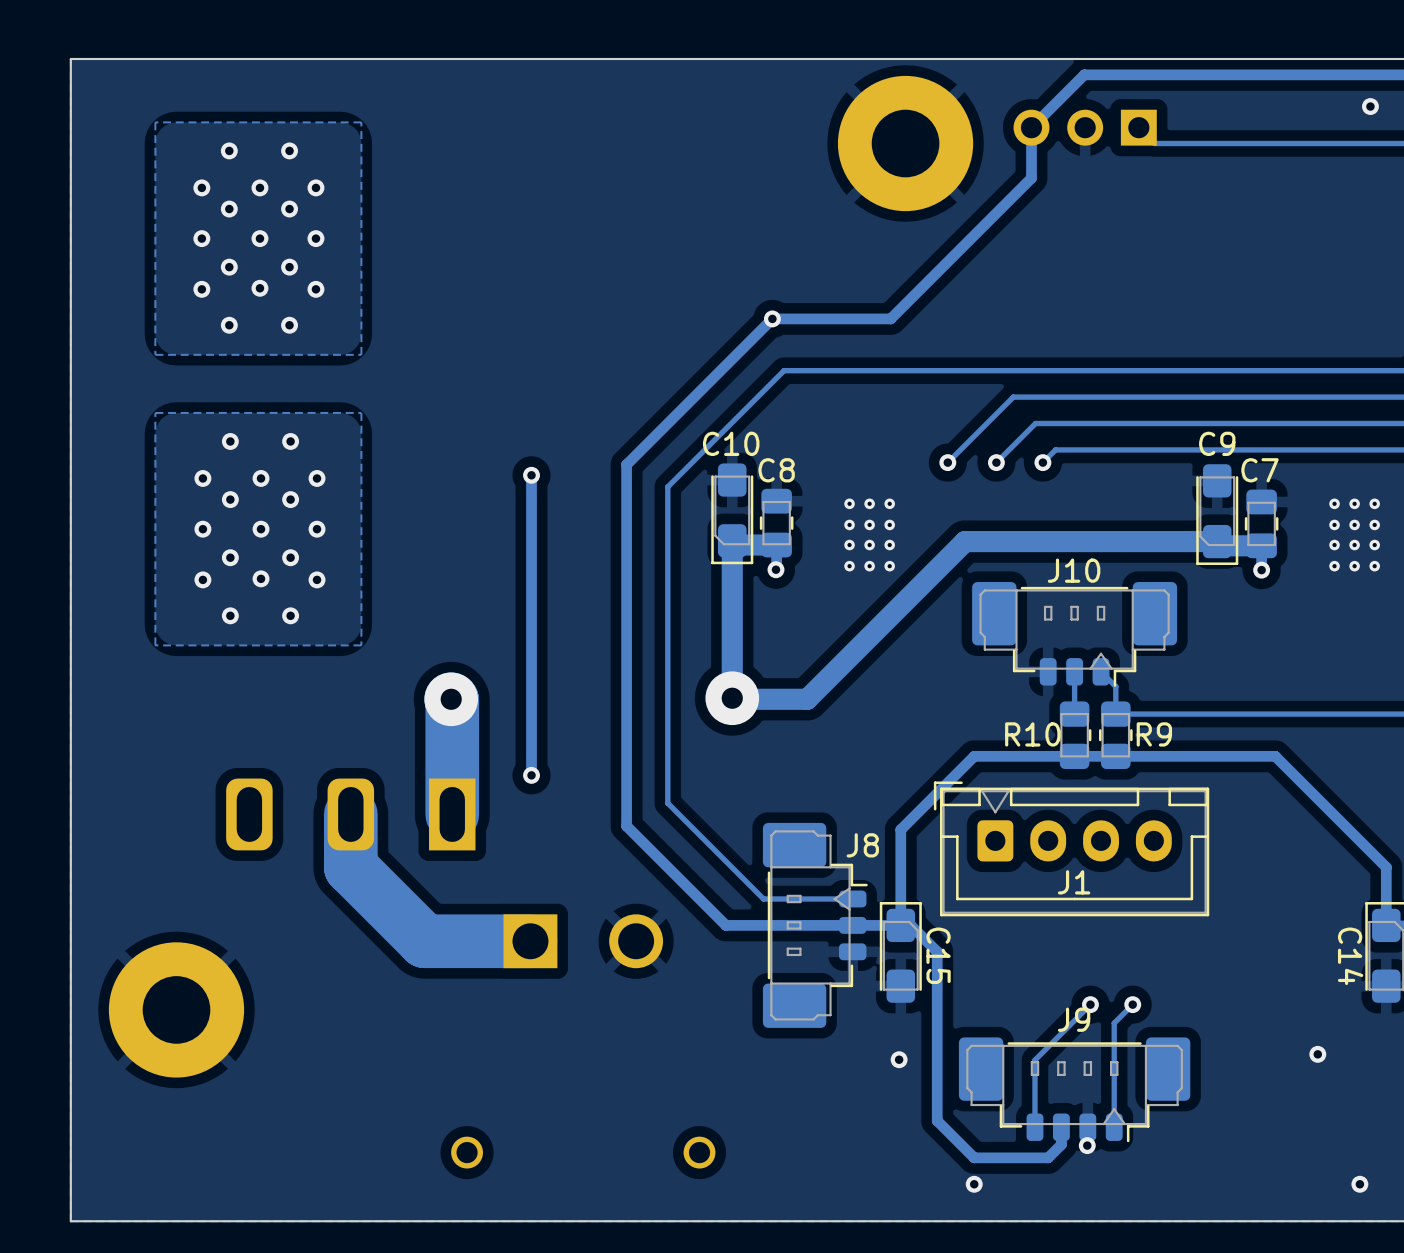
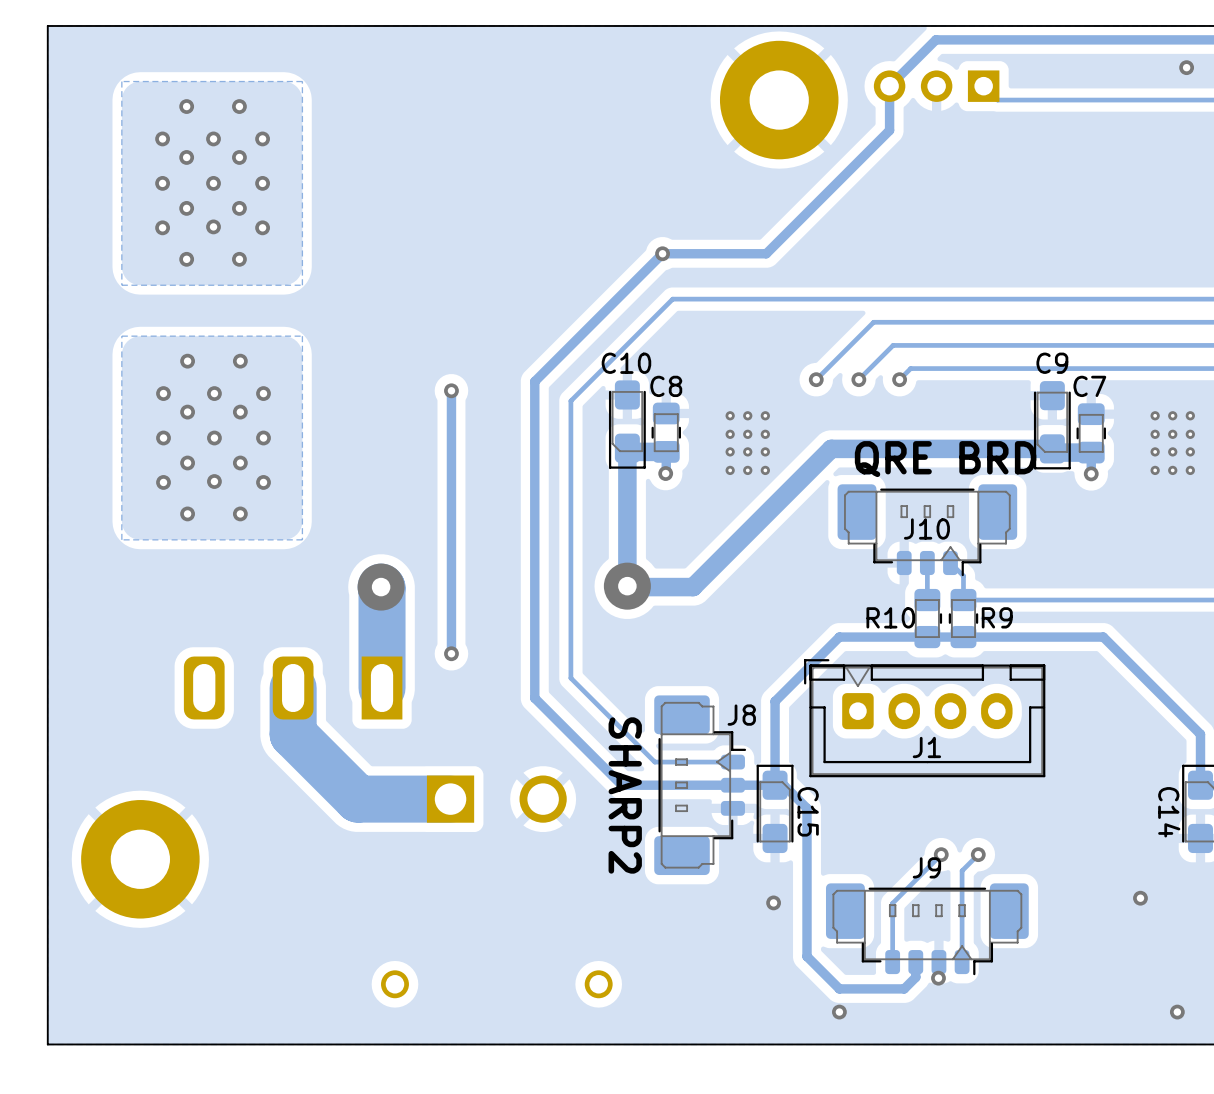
text: none -> QRE BRD (945, 459)
J10 name position: J10 (1074, 570) -> J10 (926, 528)
text: none -> SHARP2 (625, 795)

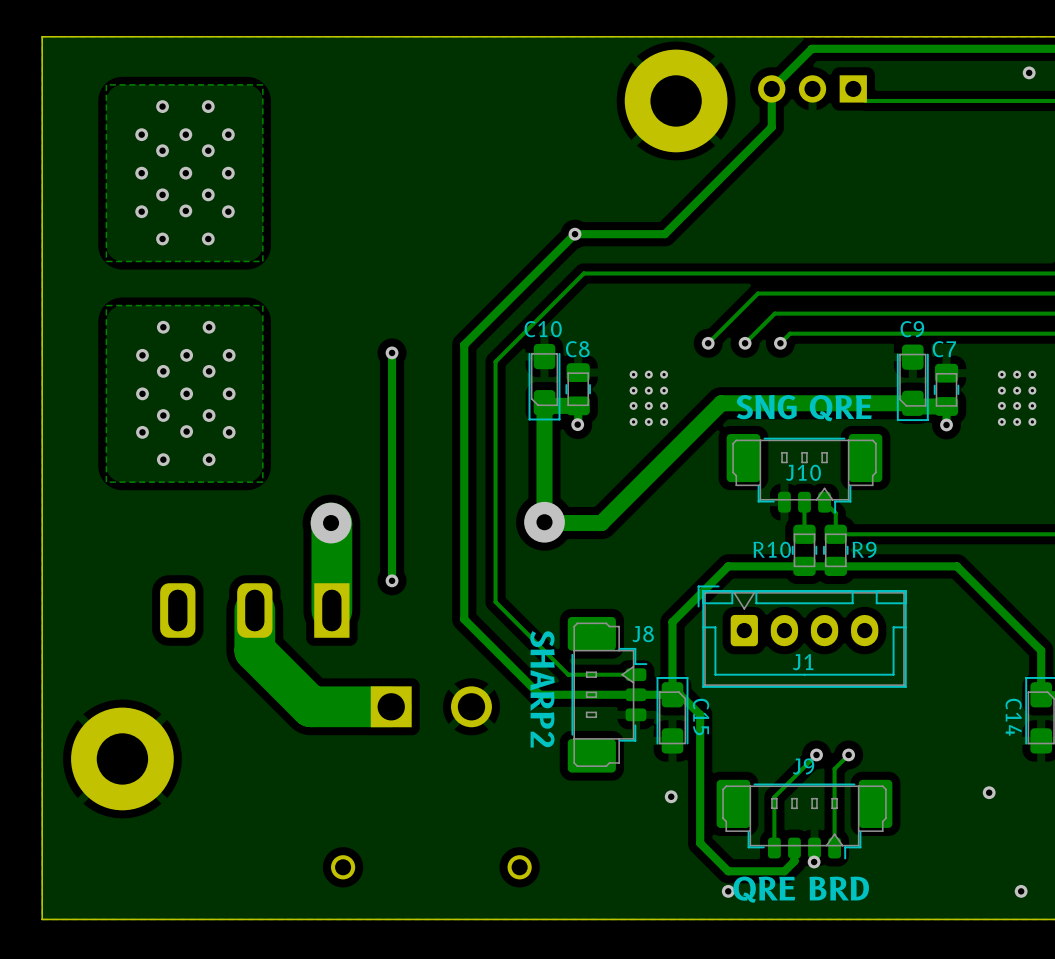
text: QRE BRD (945, 459) -> SNG QRE (804, 408)
text: none -> QRE BRD (801, 889)

